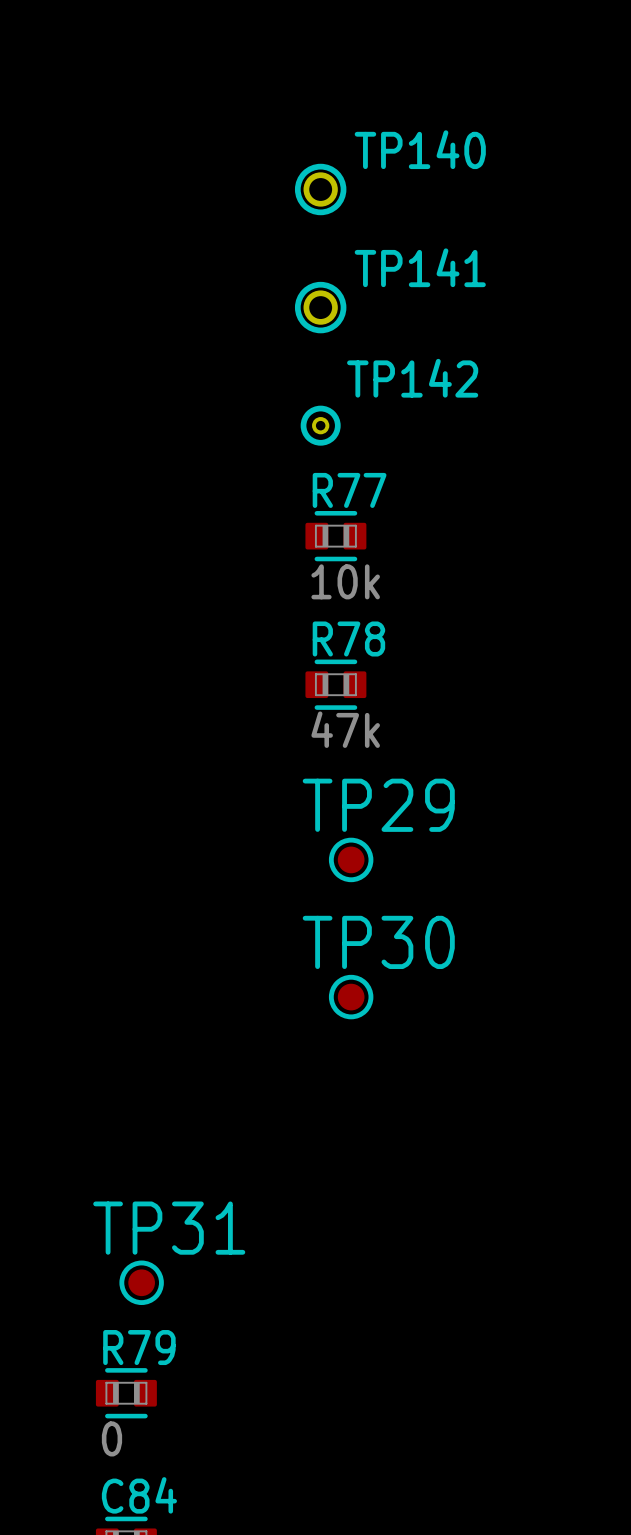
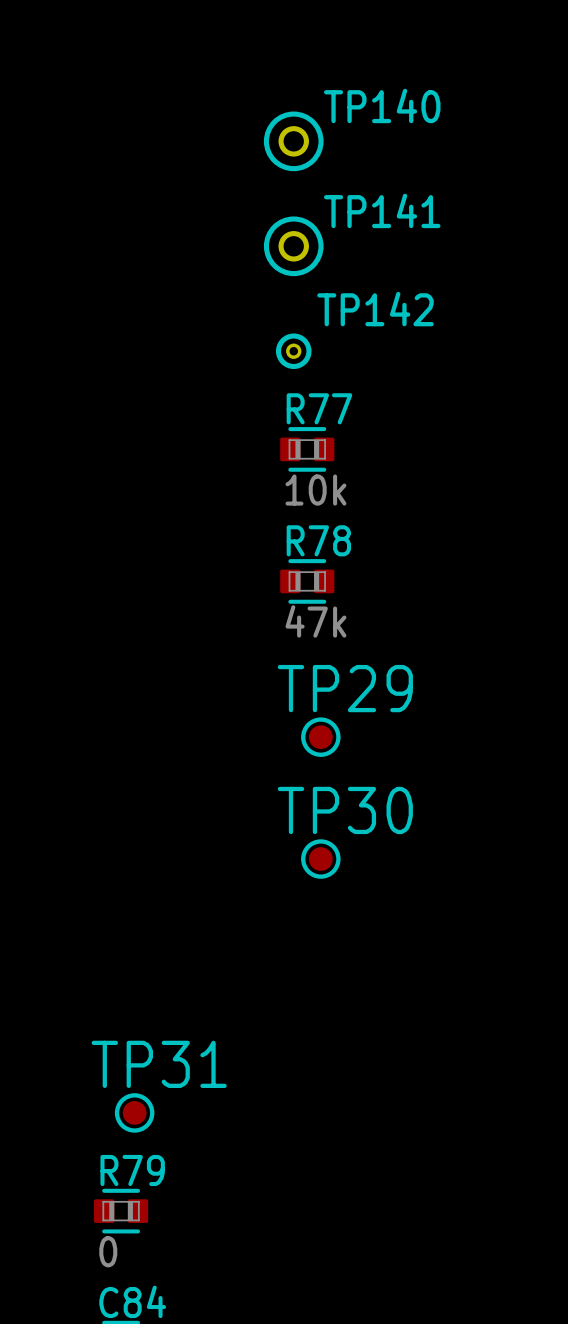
TP140 footprint: [294, 163, 347, 216] -> [263, 111, 324, 172]
TP141 footprint: [294, 281, 347, 334] -> [263, 216, 324, 277]

